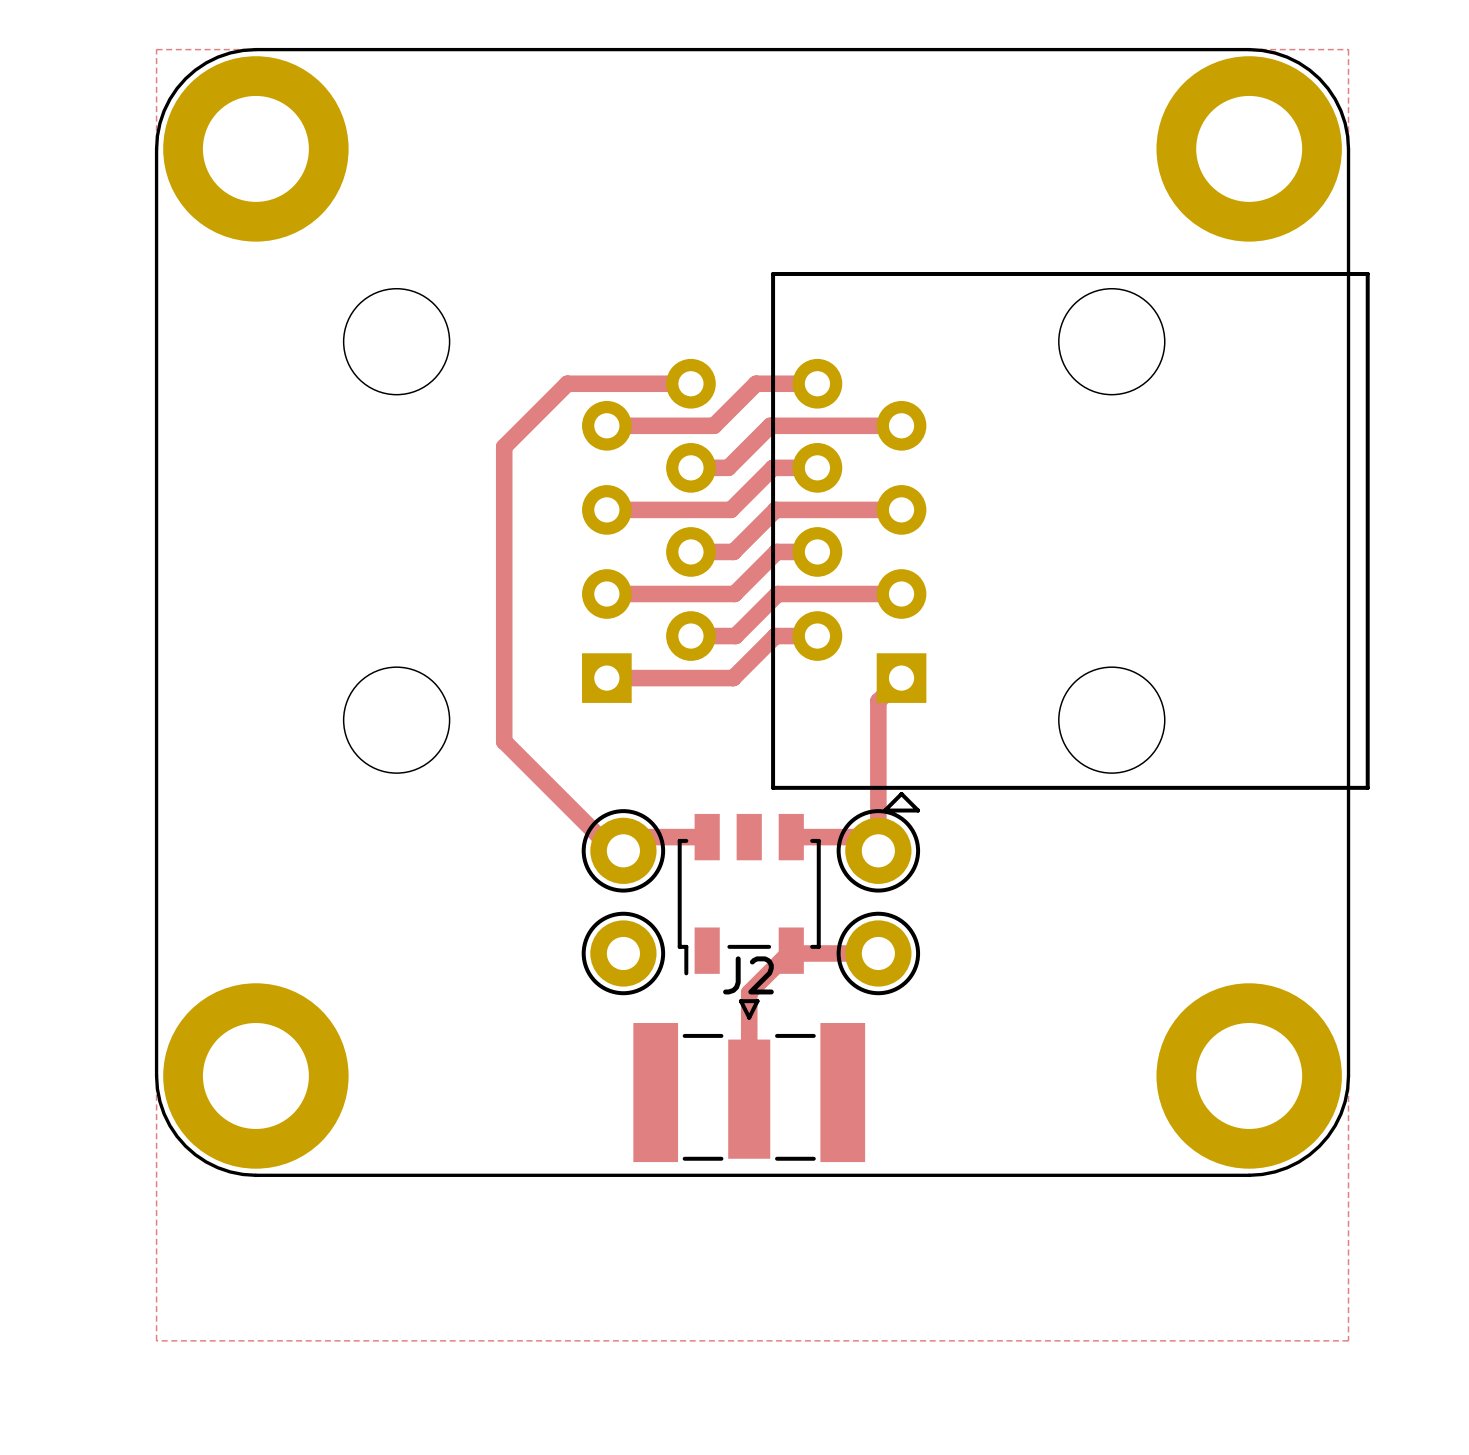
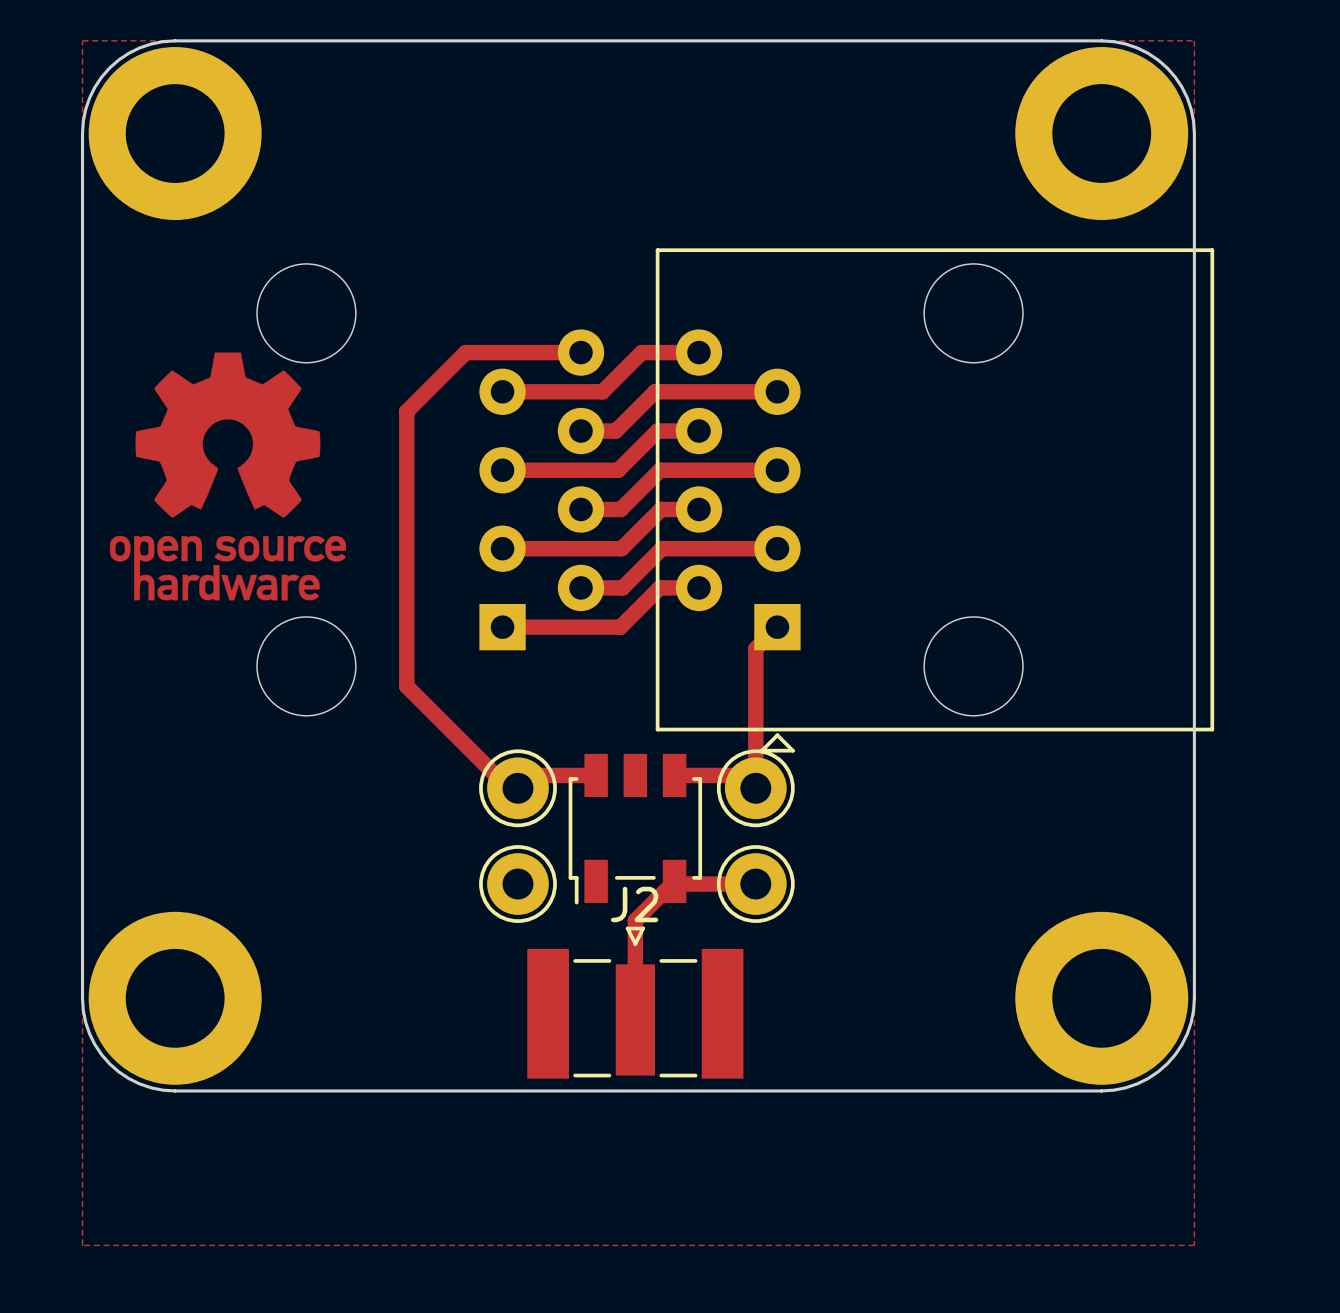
drawing: none -> [109, 352, 347, 601]

